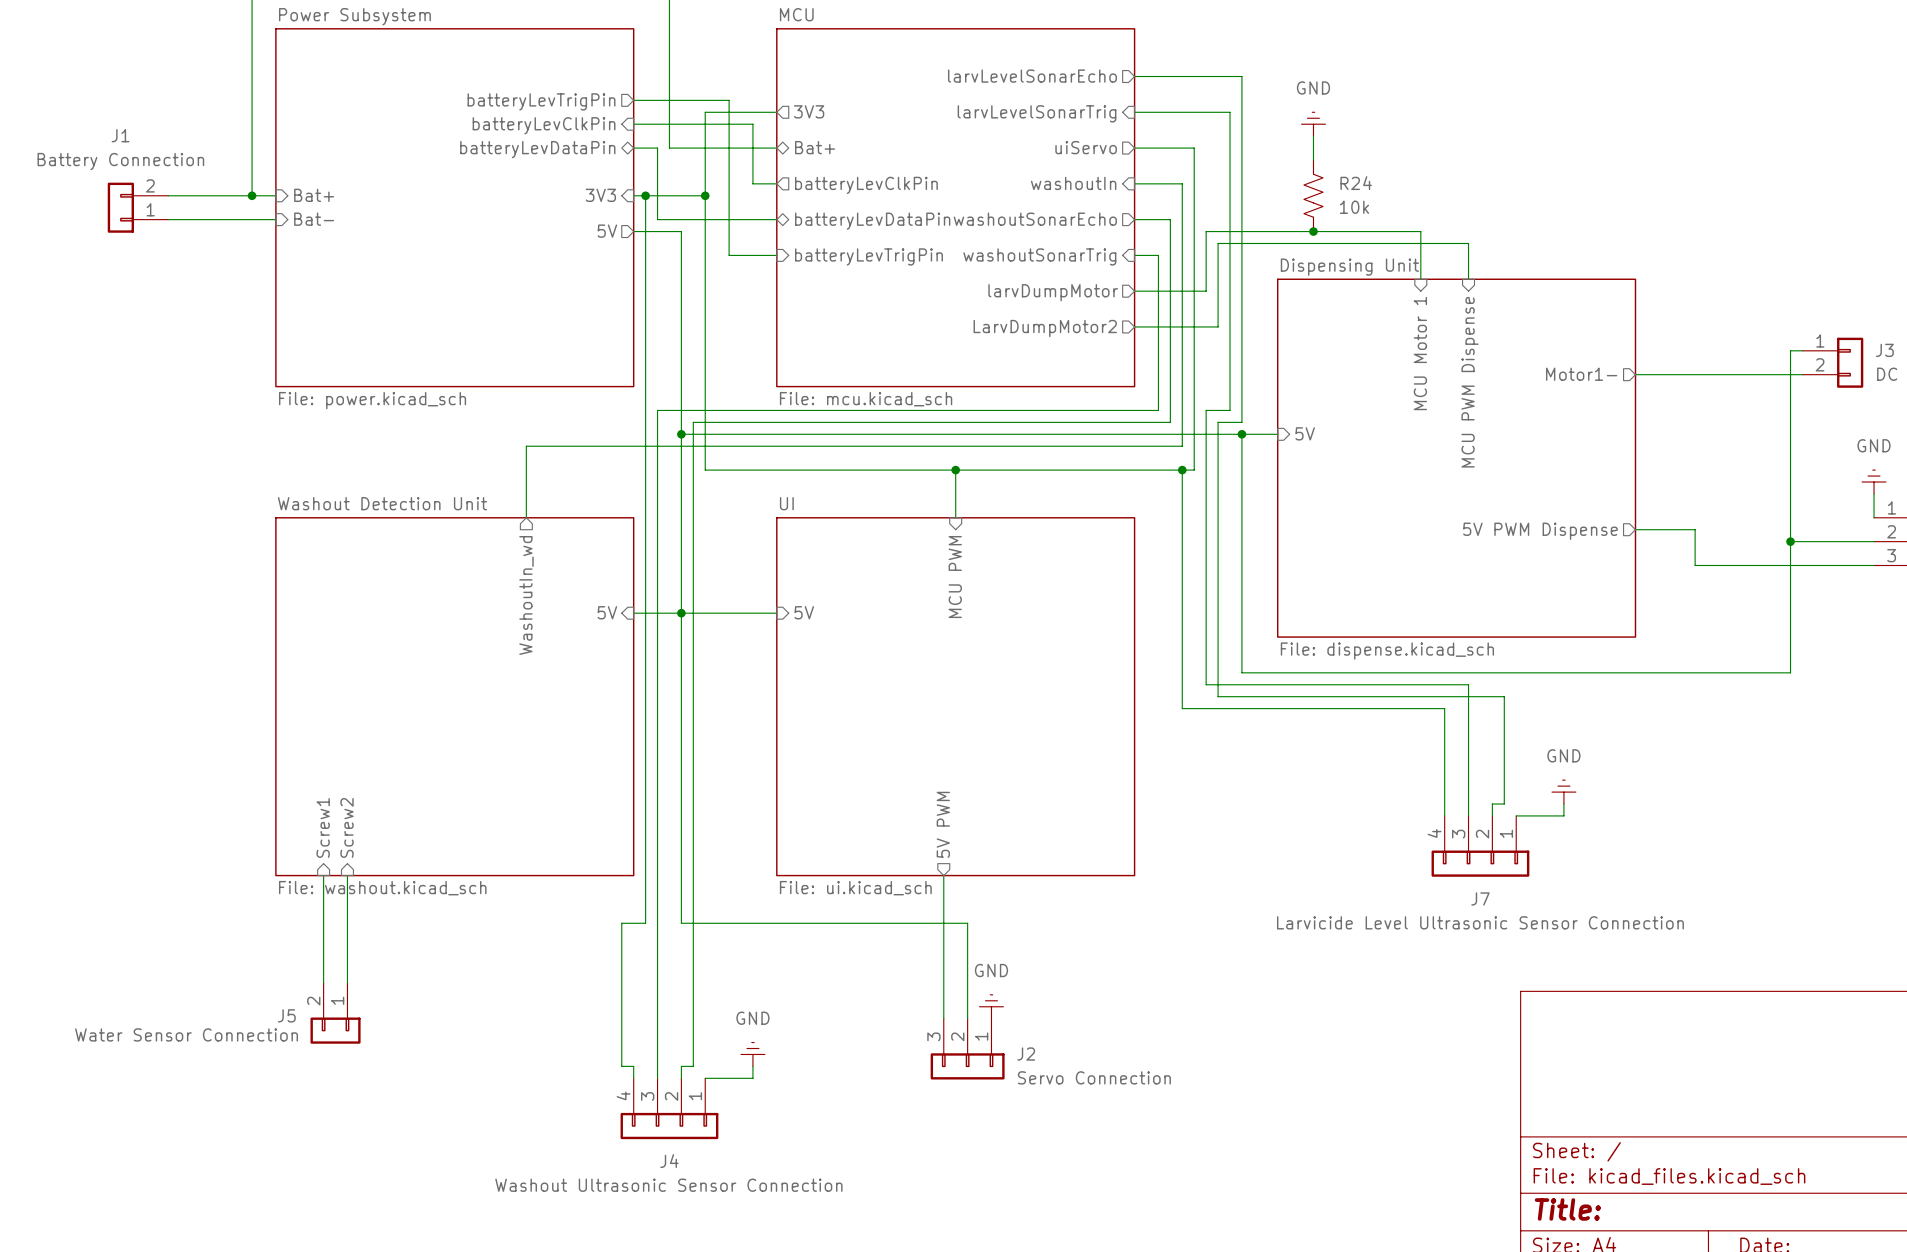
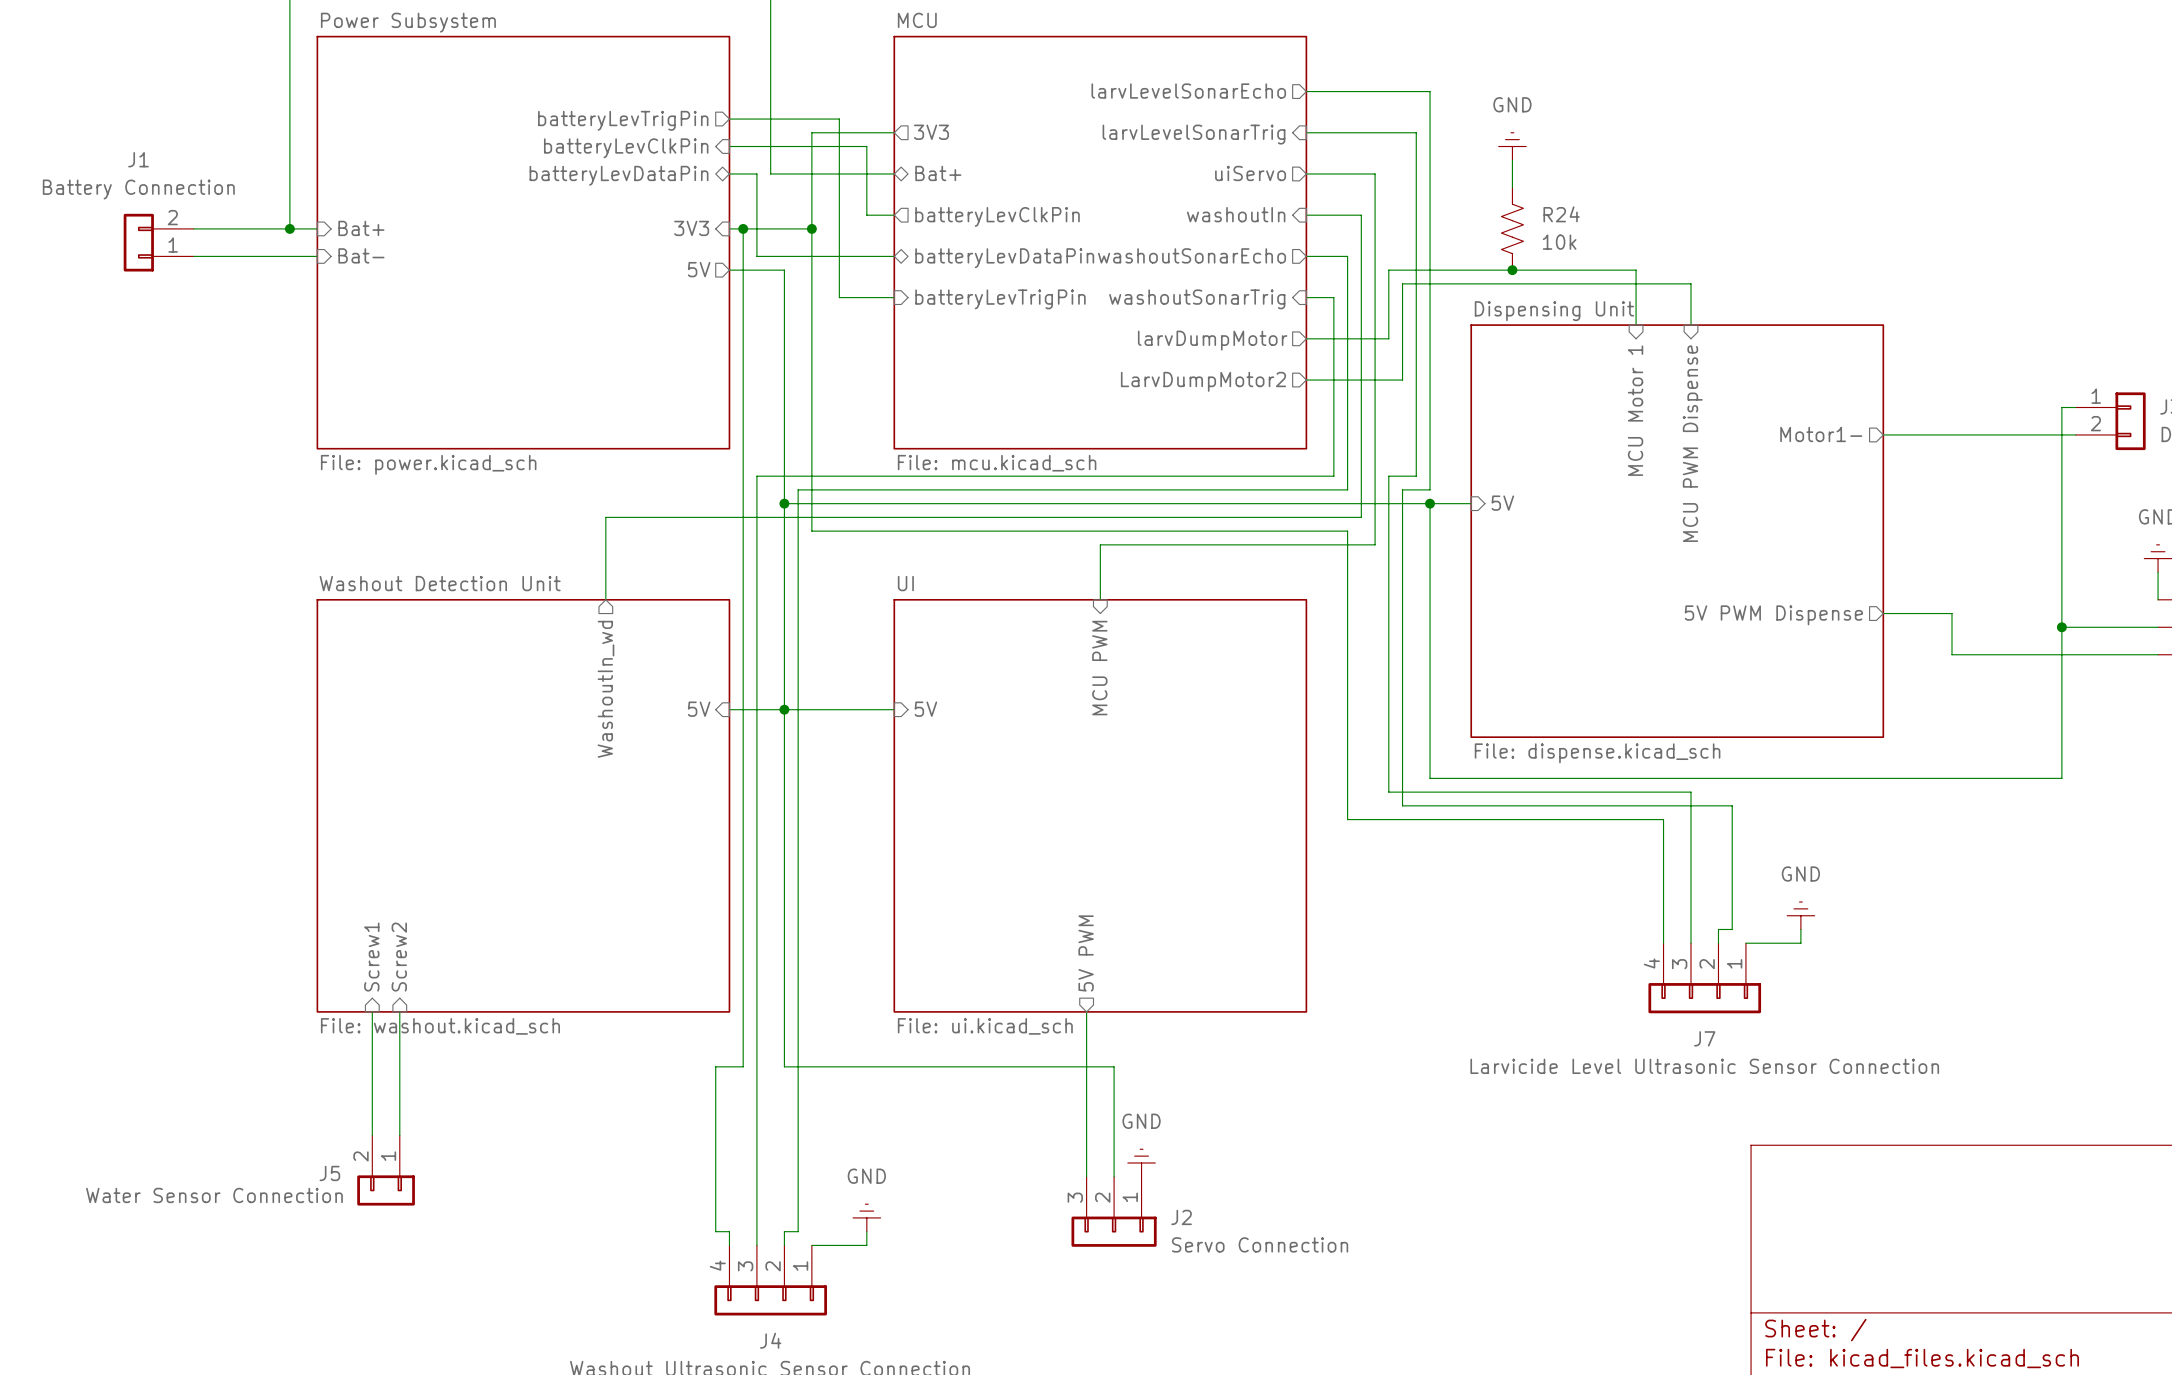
wire: (705, 458) (705, 470) (955, 470) -> (811, 531) (1347, 531) (1347, 819) (1361, 819)
junction: (955, 470) -> none
wire: (1182, 470) (1182, 708) -> none
junction: (1182, 470) -> none

